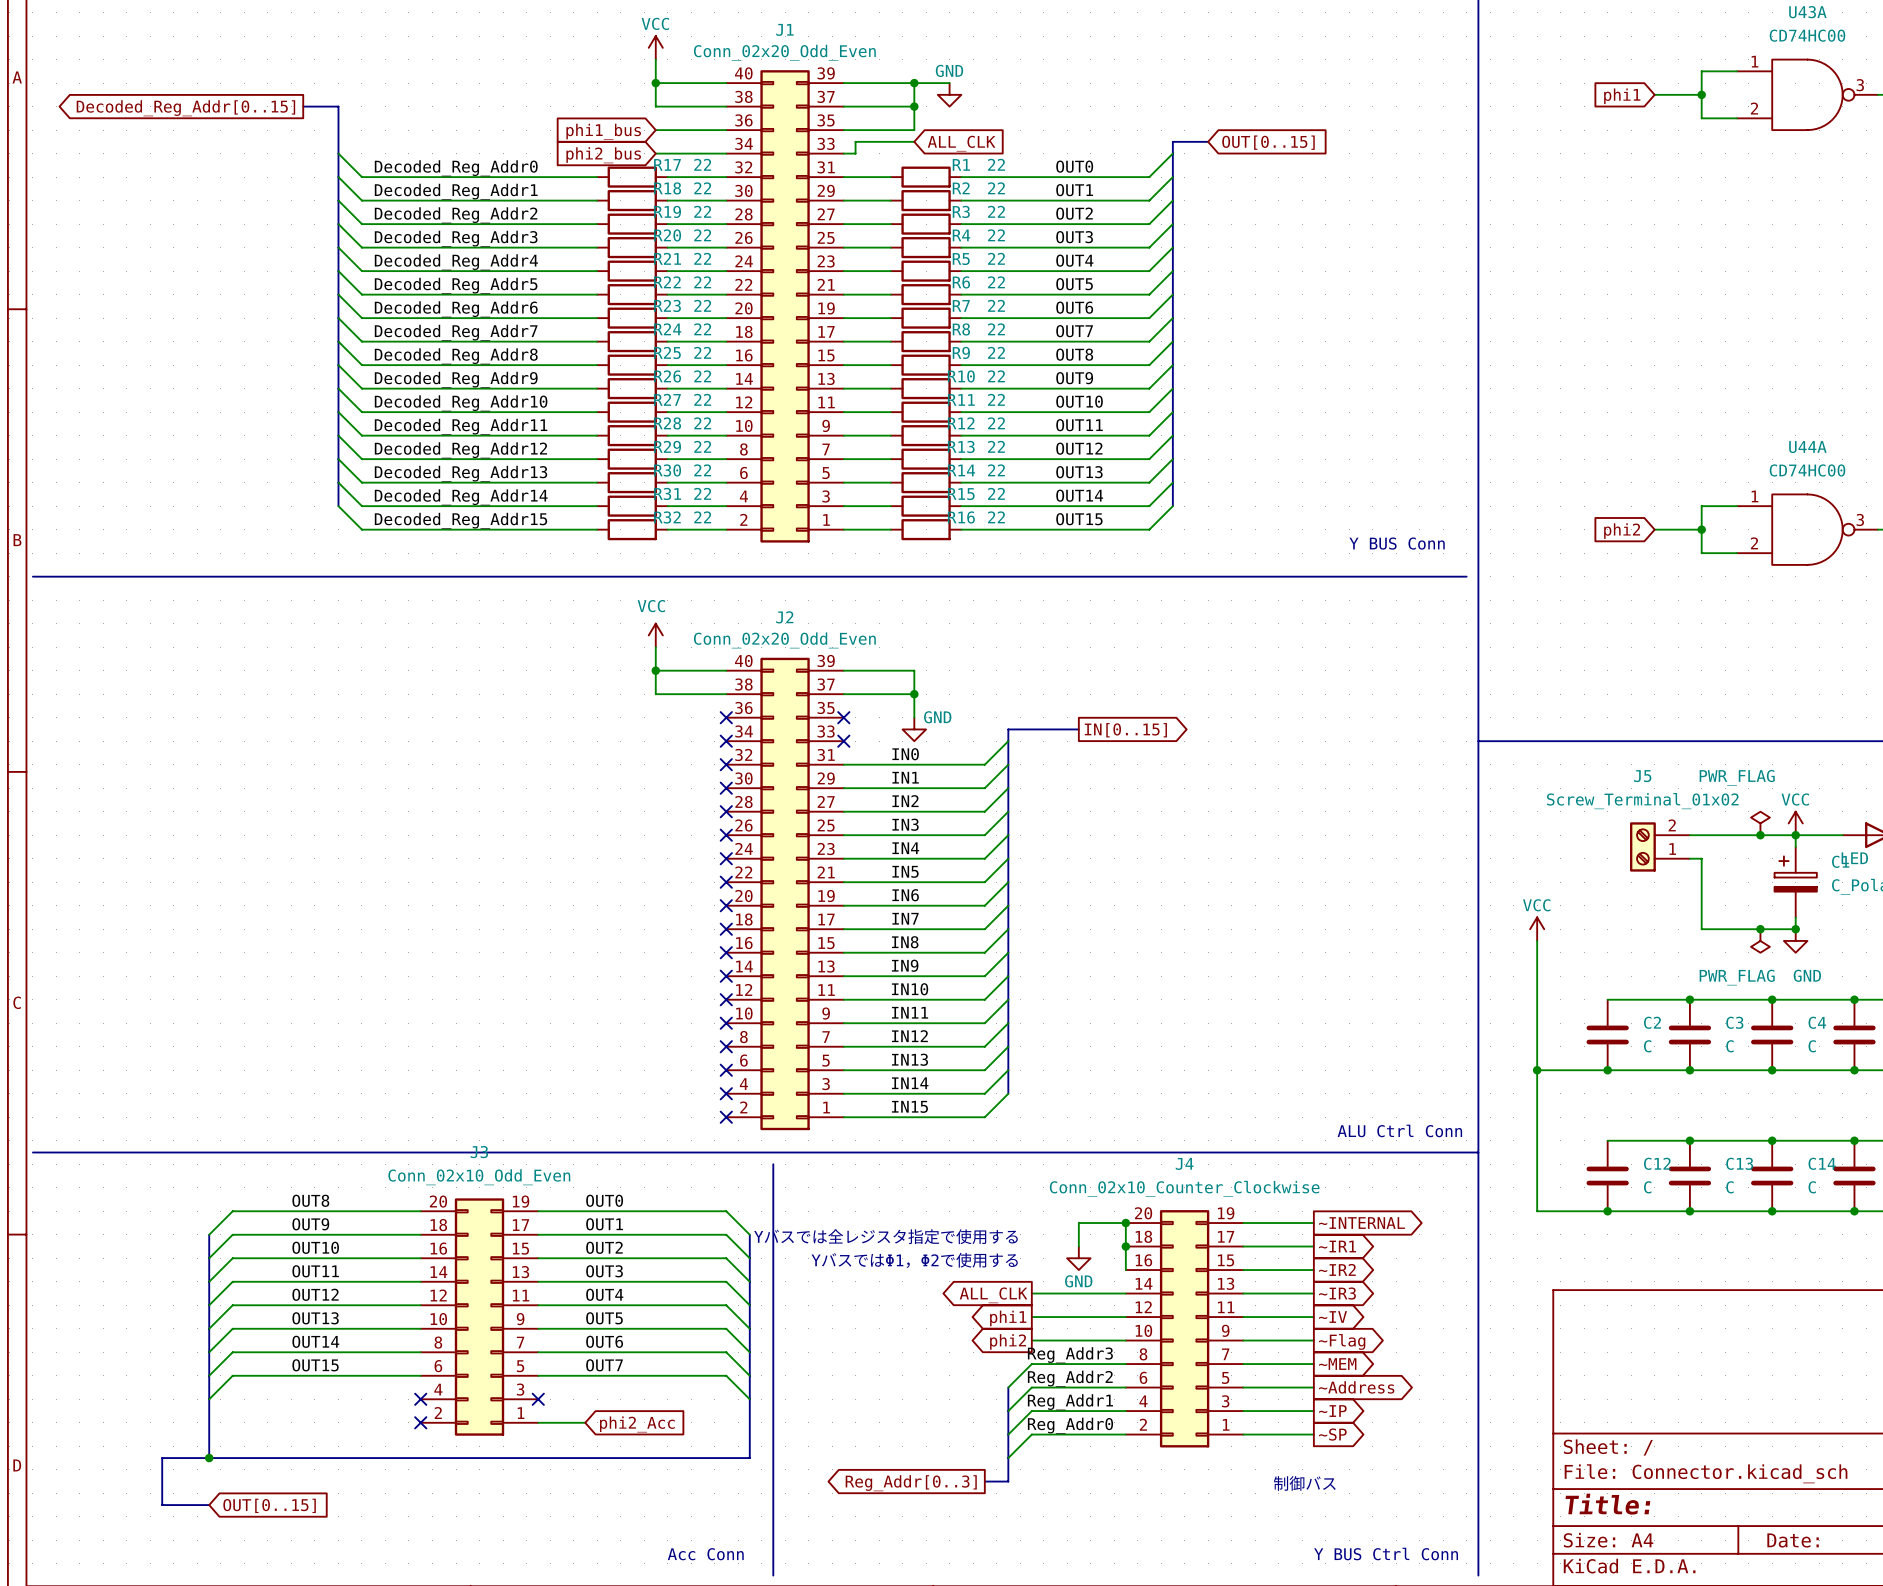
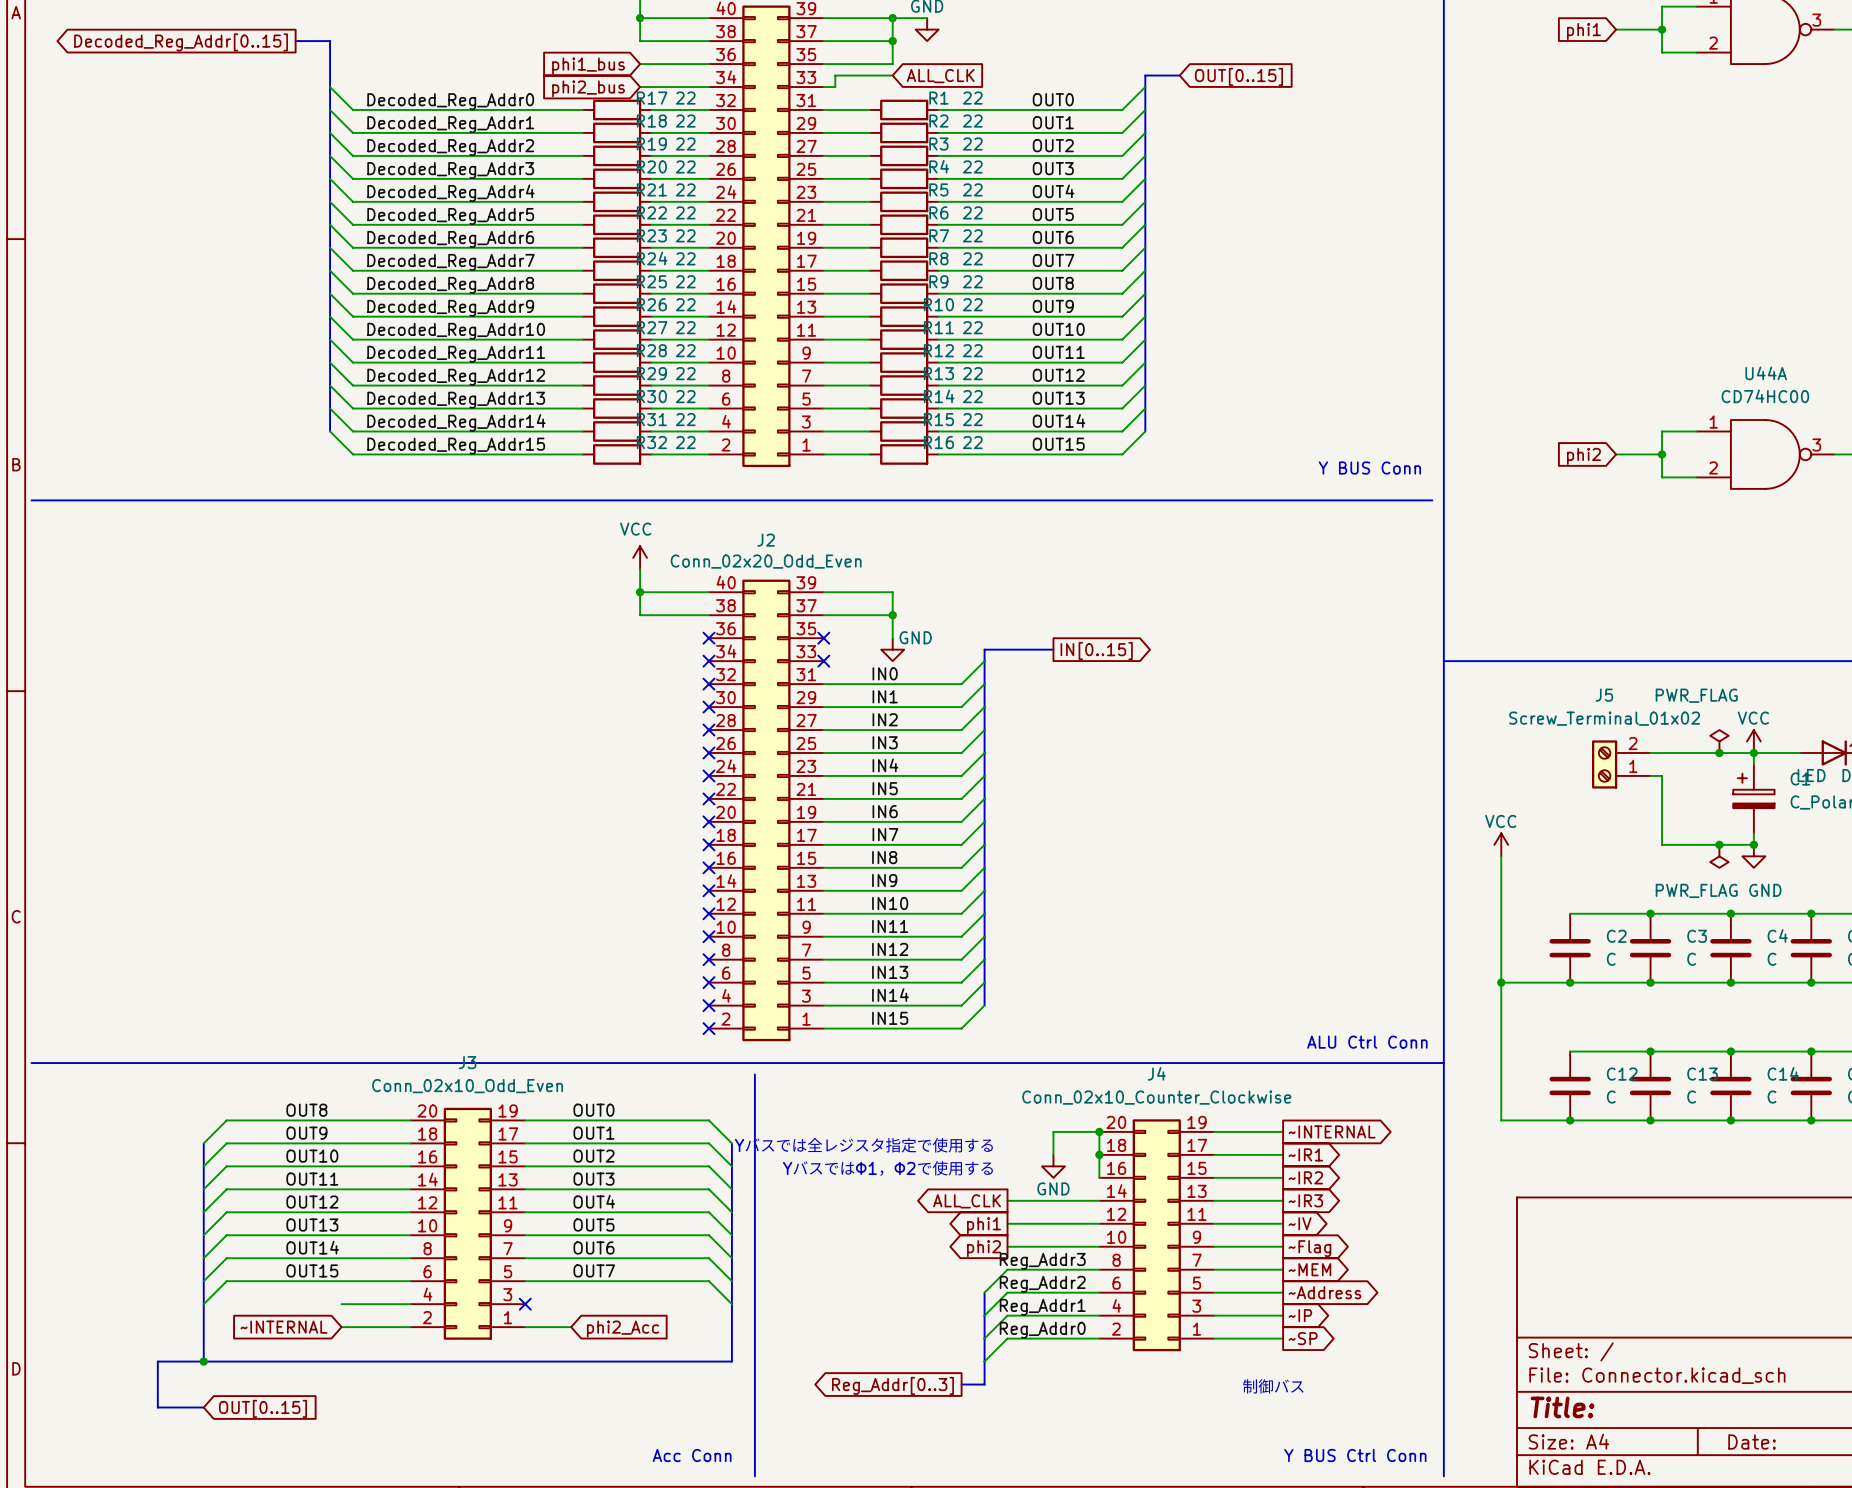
wire: none -> (341, 1304) (410, 1304)
no-connect mark: (420, 1399) -> none
global label: none -> ~INTERNAL (283, 1327)
wire: none -> (341, 1327) (410, 1327)
no-connect mark: (420, 1422) -> none

